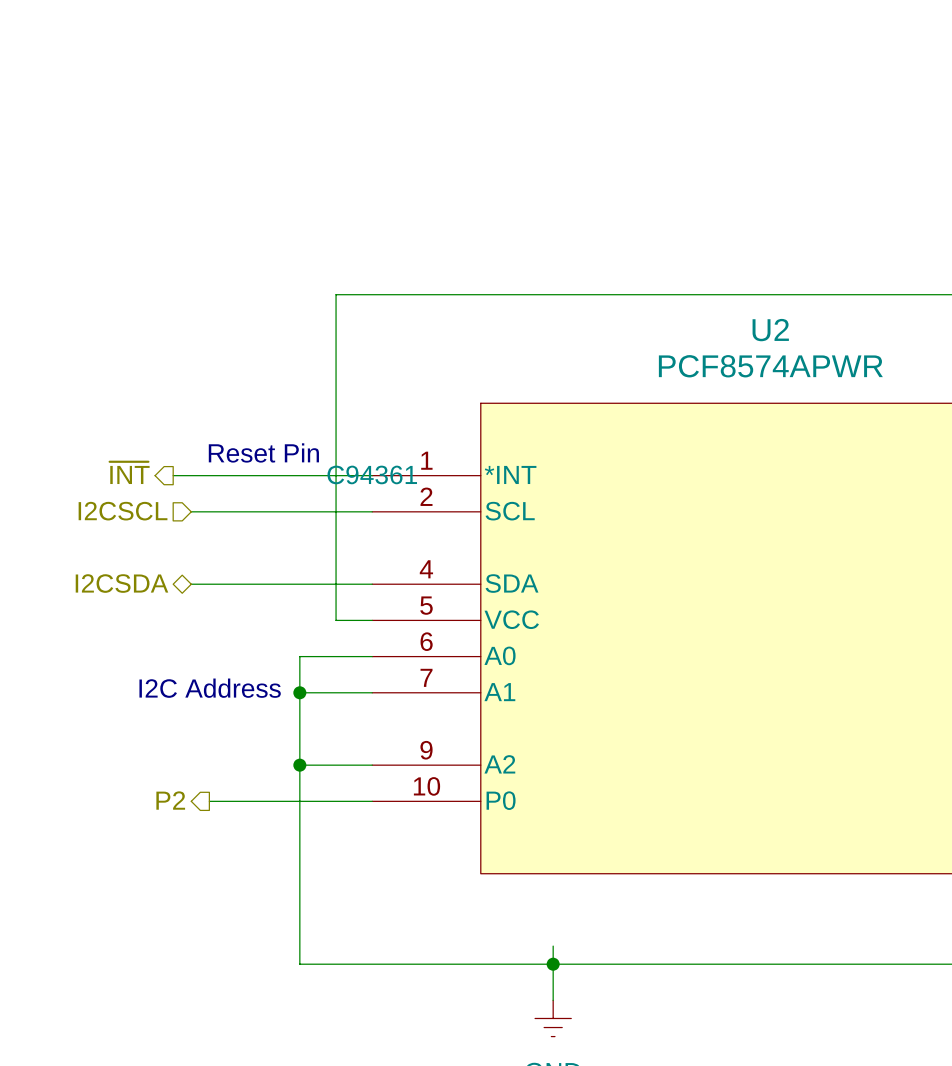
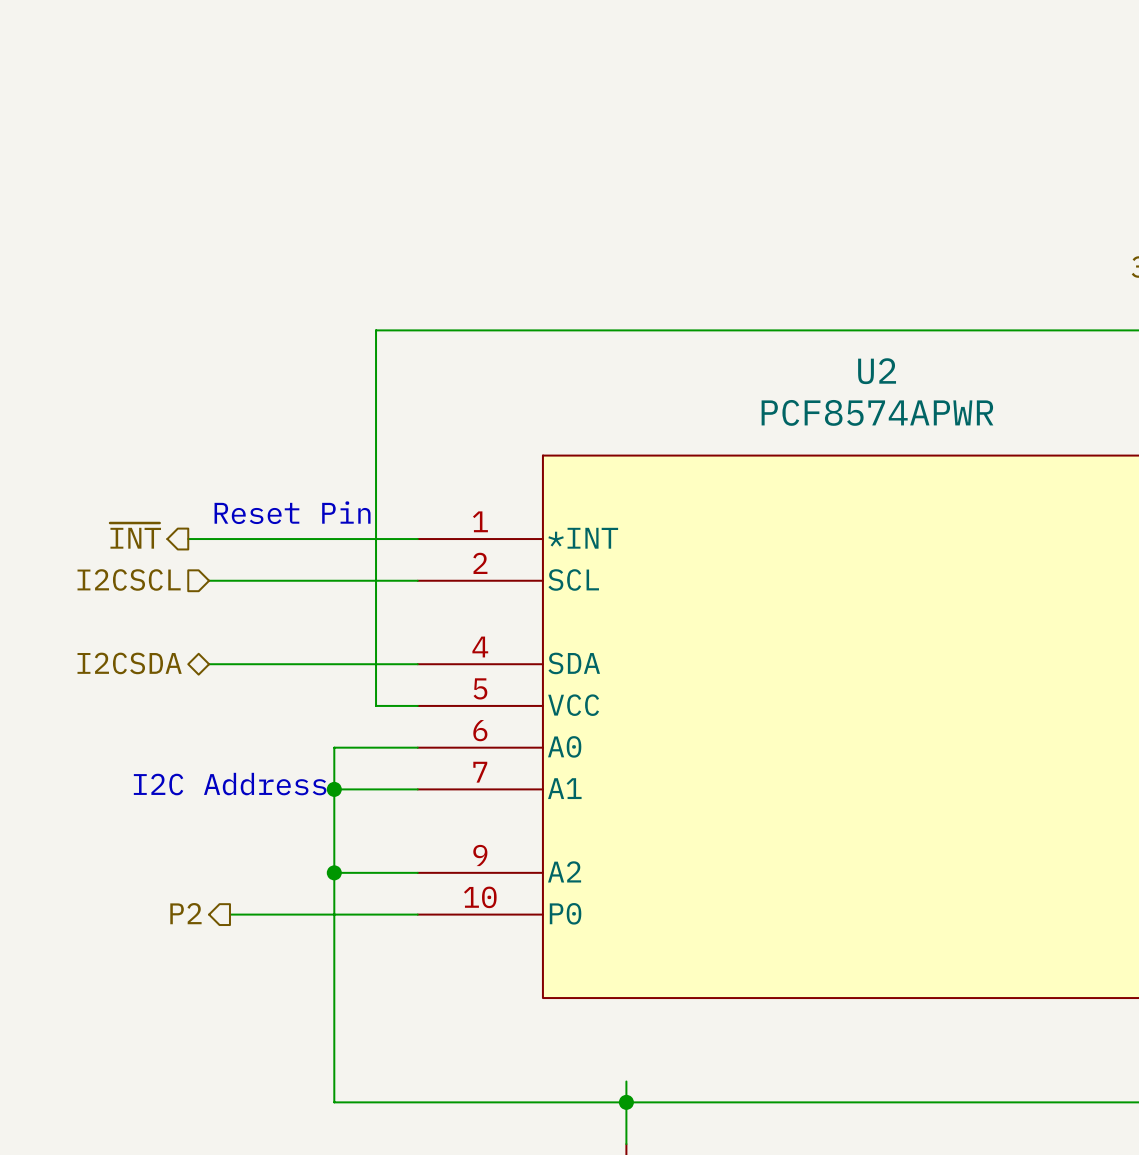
U2 text: C94361 (372, 474) -> none

